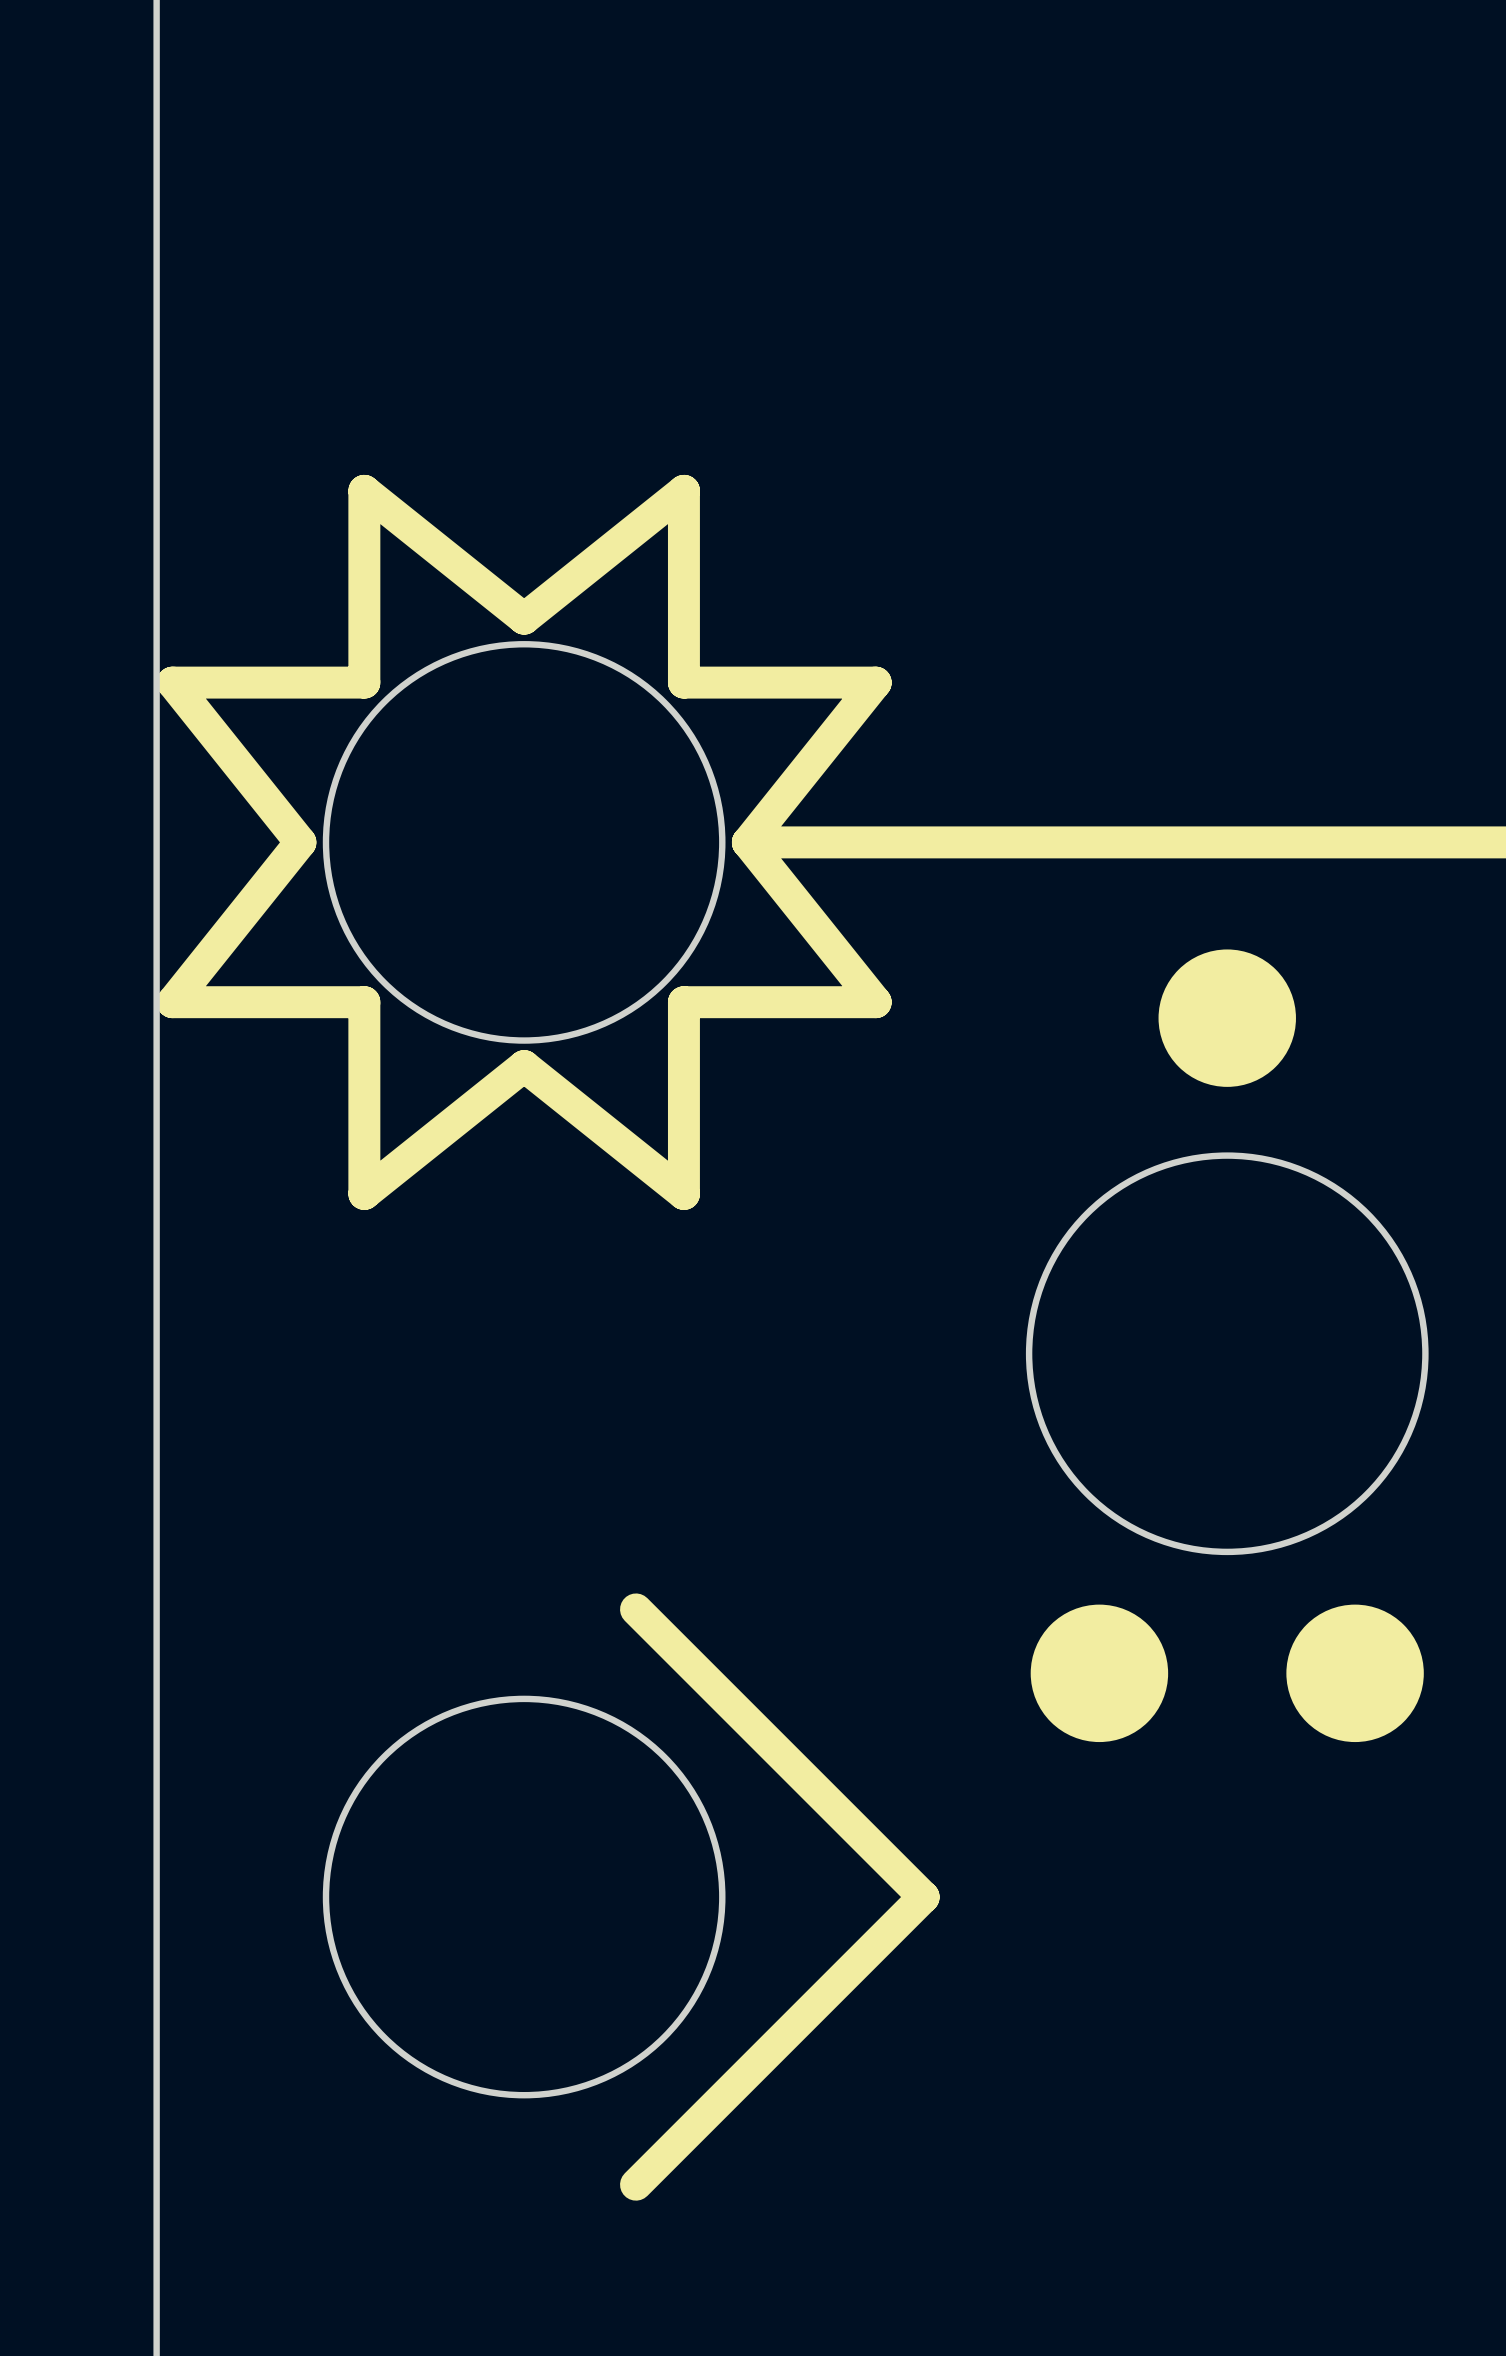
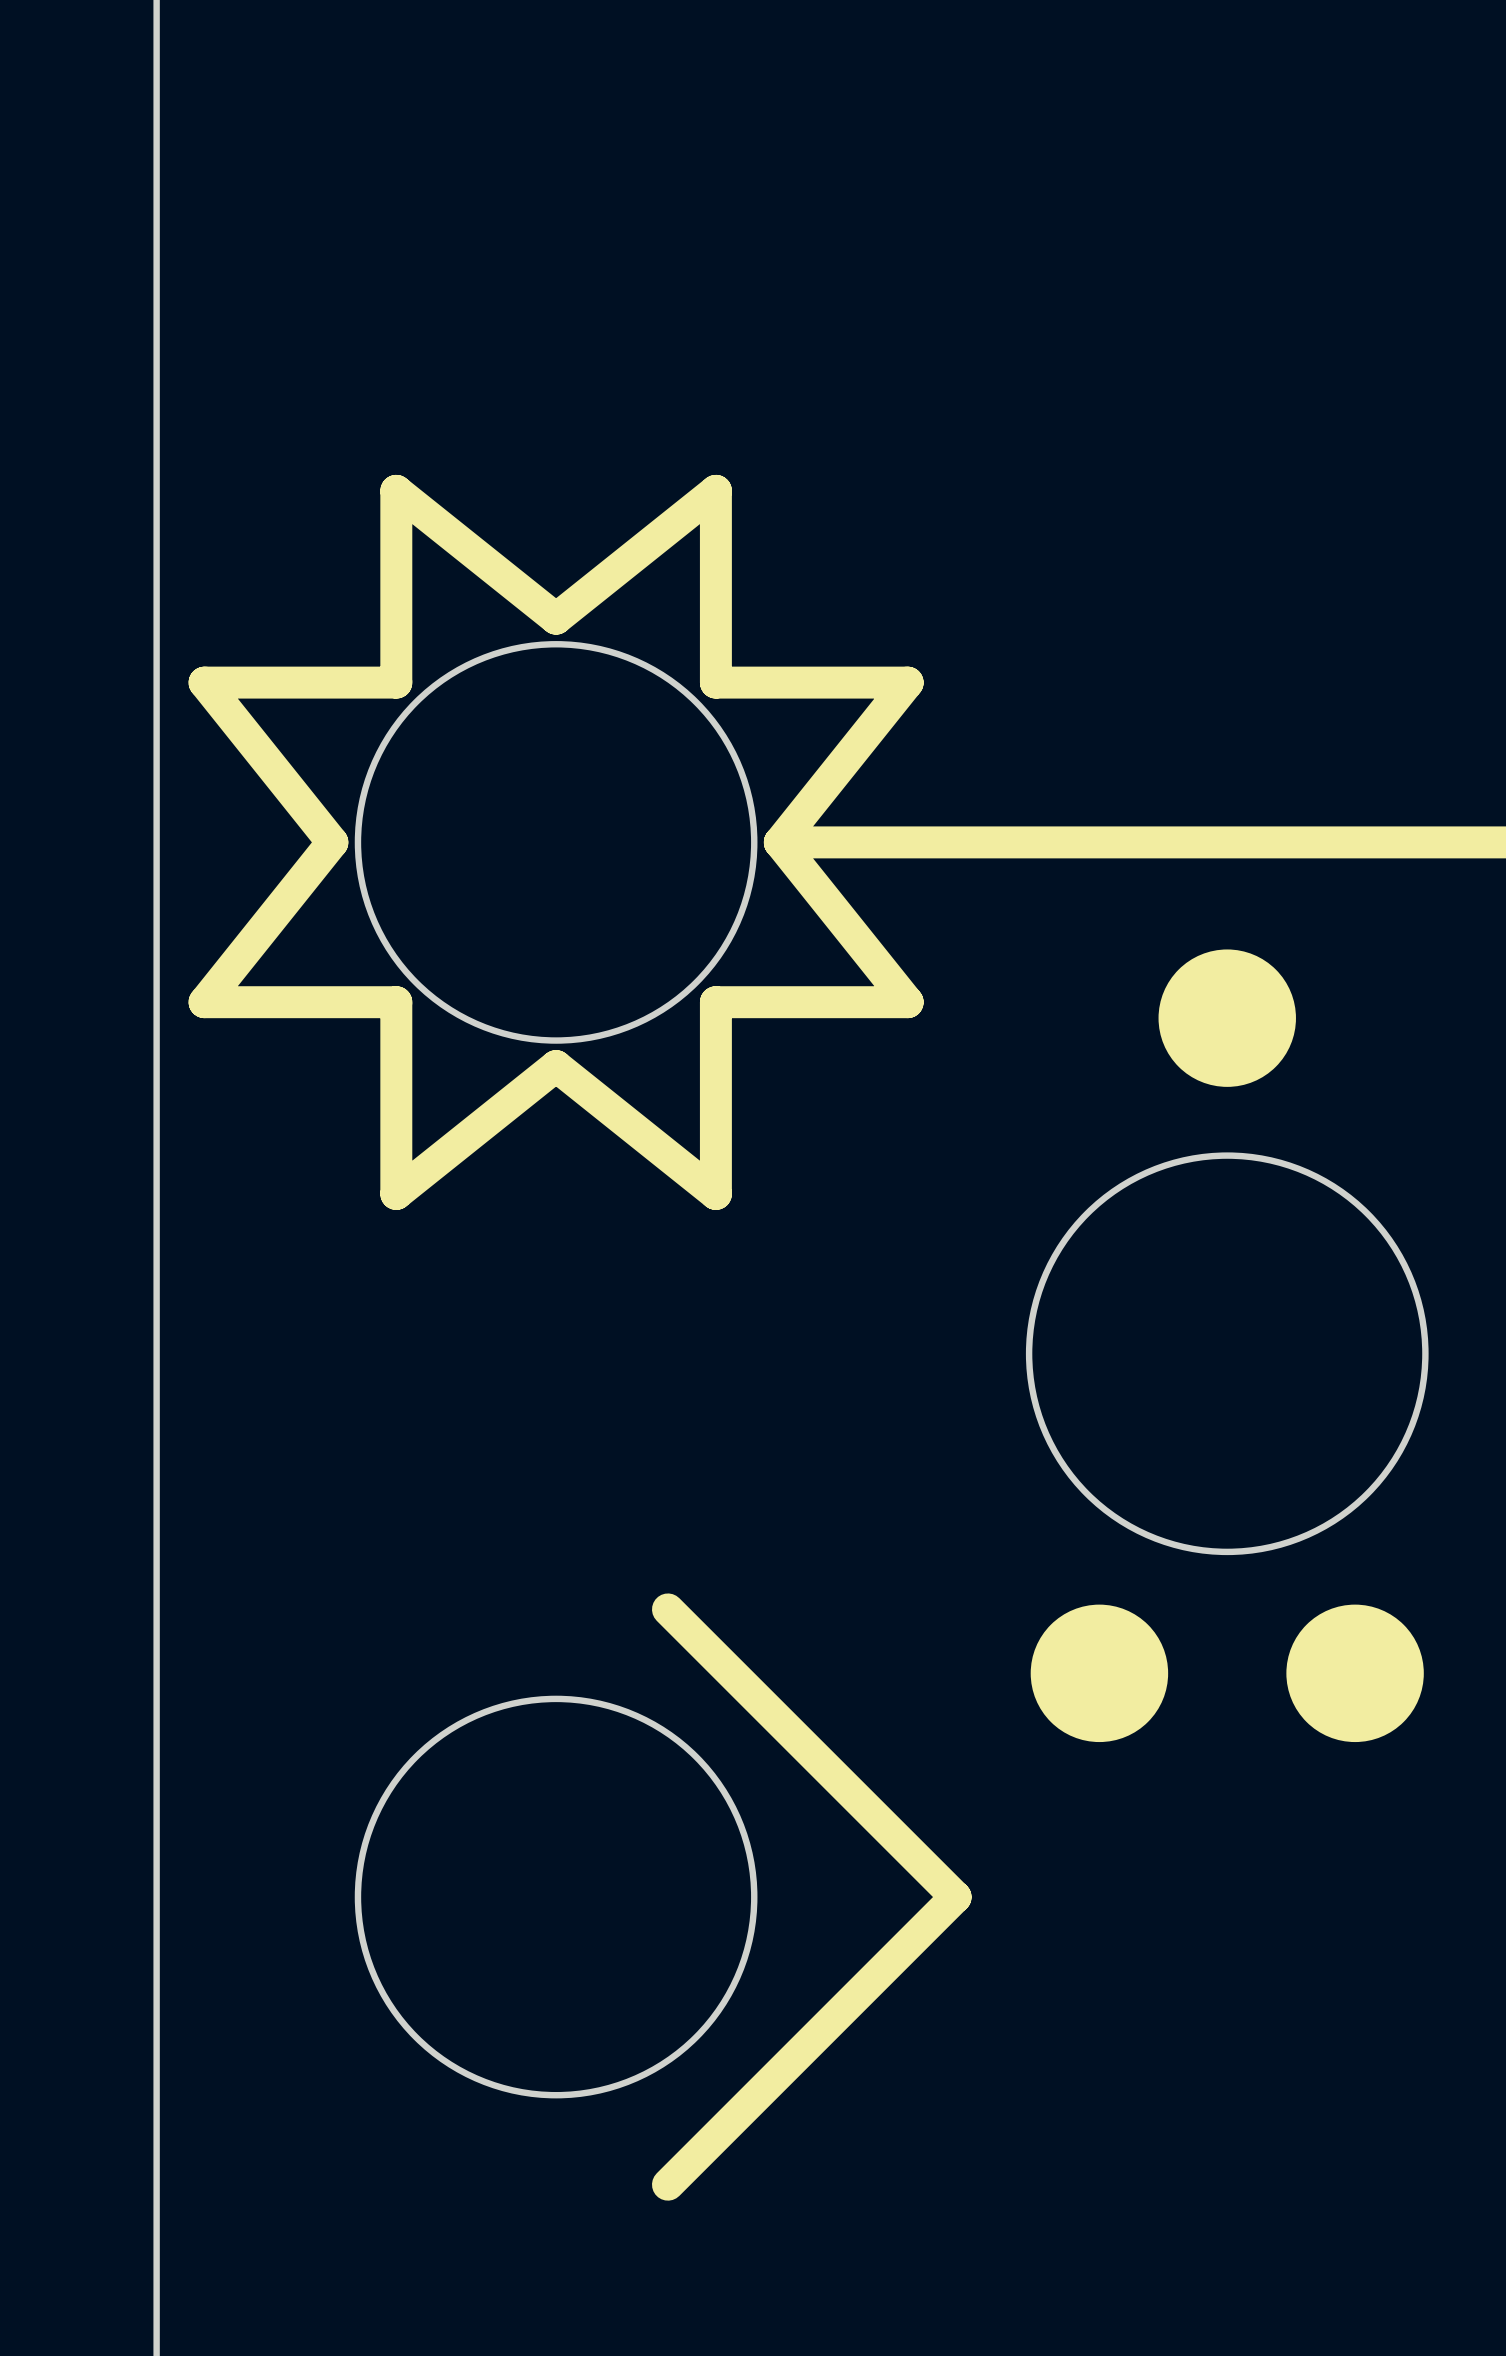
drawing position: (524, 842) -> (556, 842)
round board edge position: (524, 842) -> (556, 842)
round board edge position: (524, 1897) -> (556, 1897)
drawing position: (779, 1897) -> (811, 1897)

